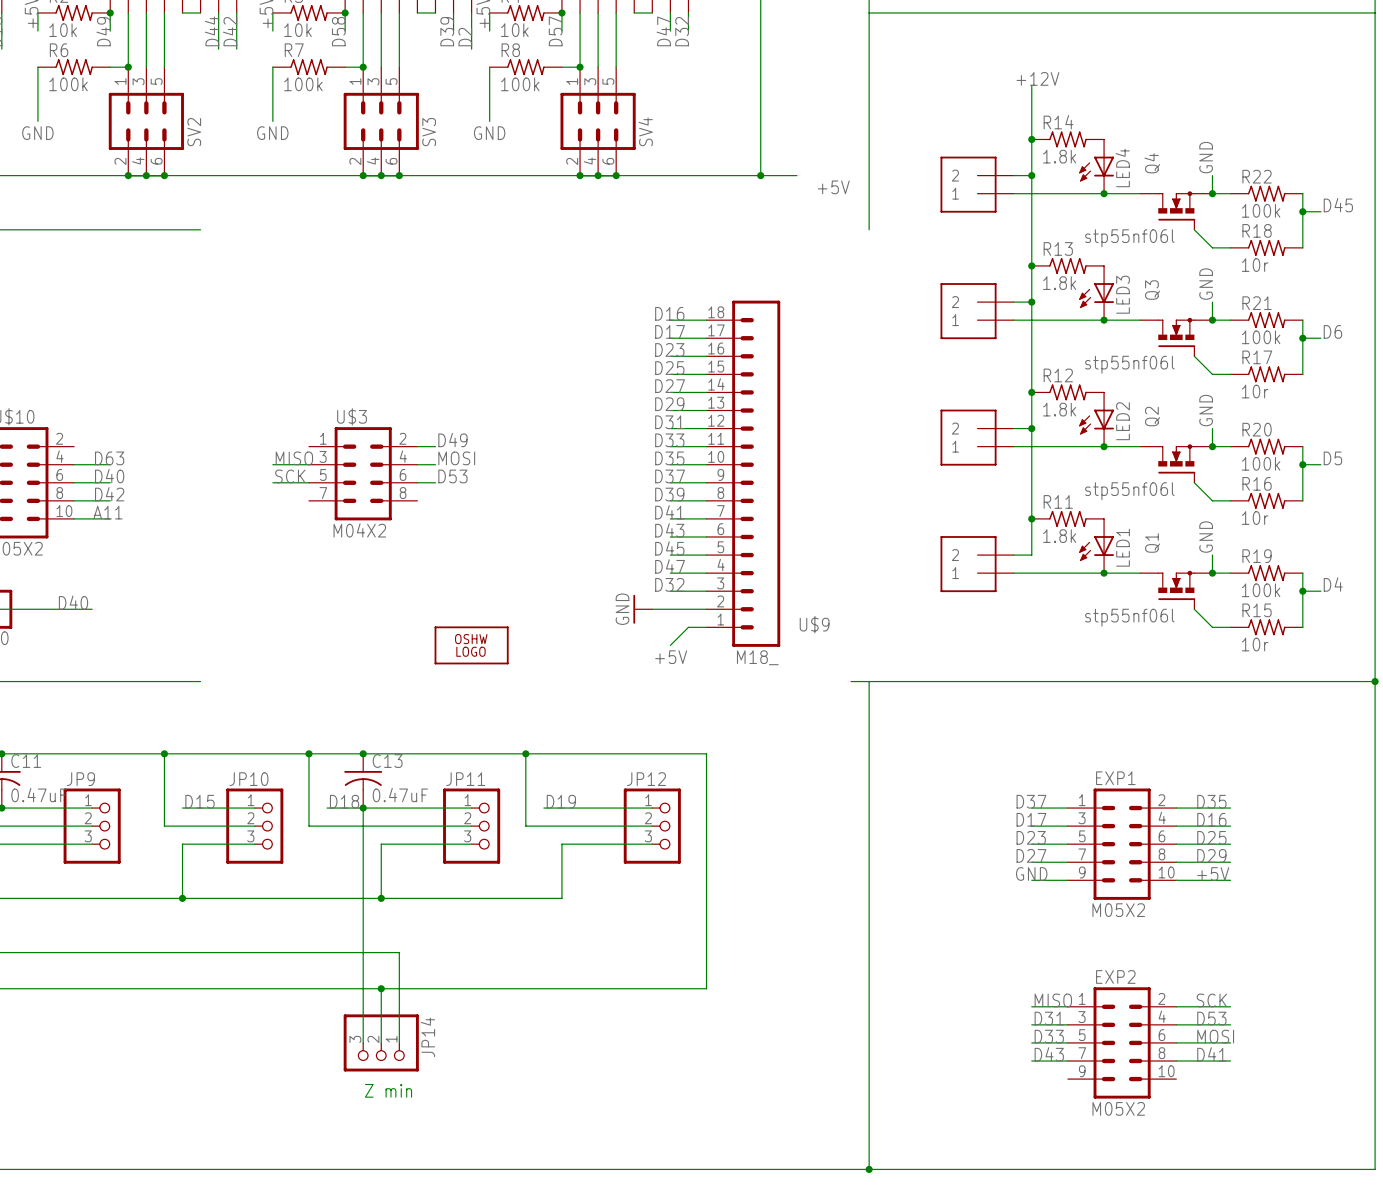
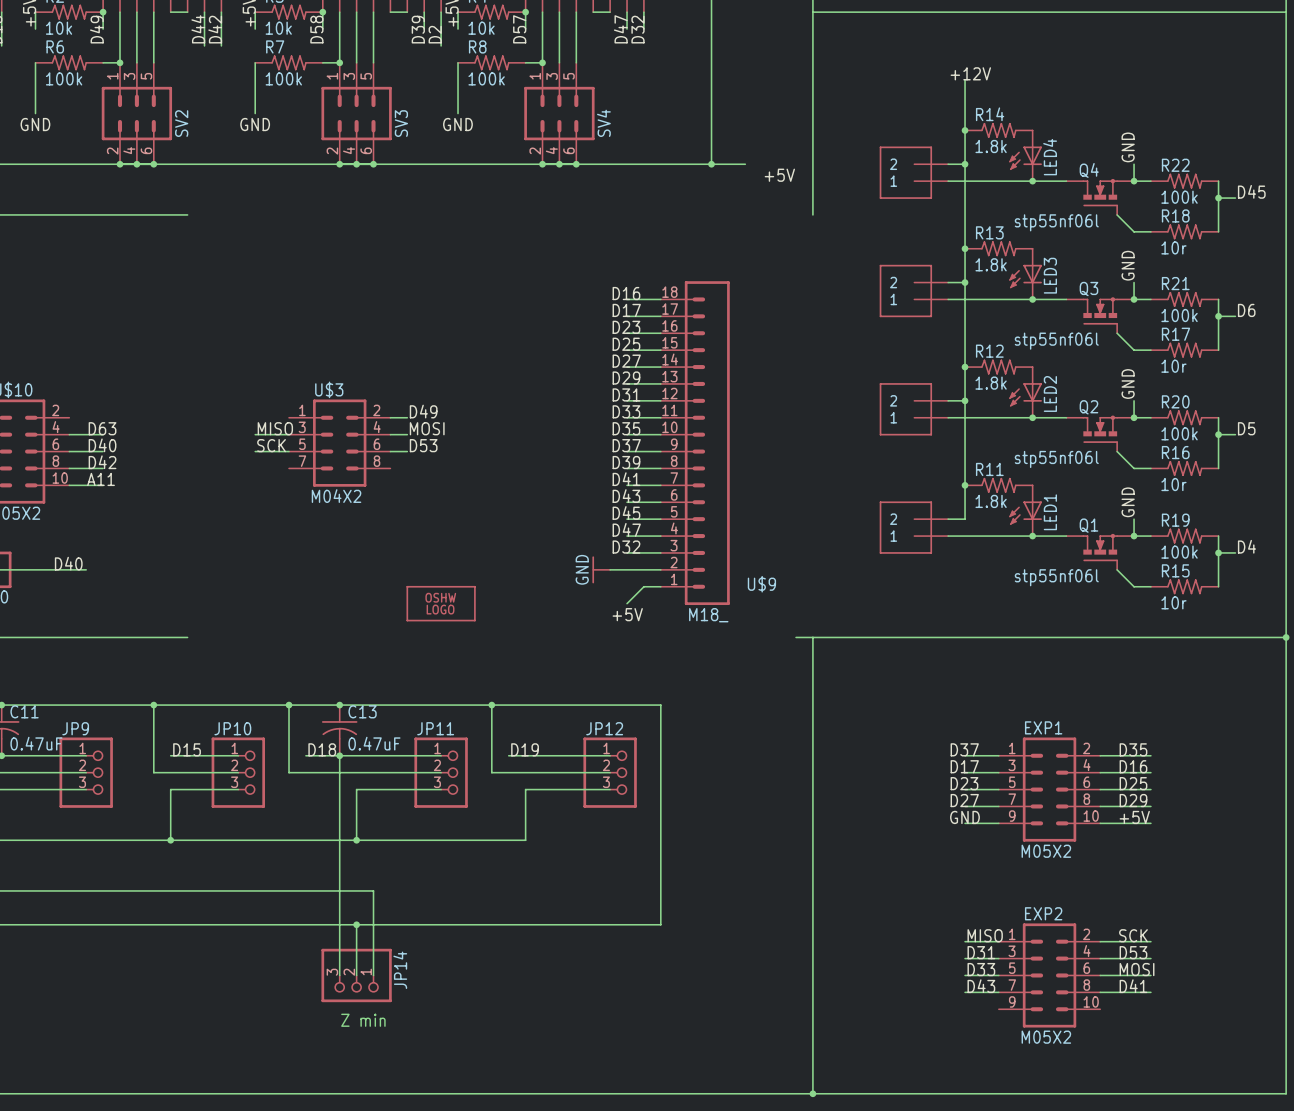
Q4 name rotation: 0° (1152, 163) -> 90° clockwise (1089, 170)
Q3 name rotation: 0° (1152, 290) -> 90° clockwise (1088, 289)
Q2 name rotation: 0° (1152, 416) -> 90° clockwise (1088, 407)
Q1 name rotation: 0° (1152, 543) -> 90° clockwise (1088, 525)

